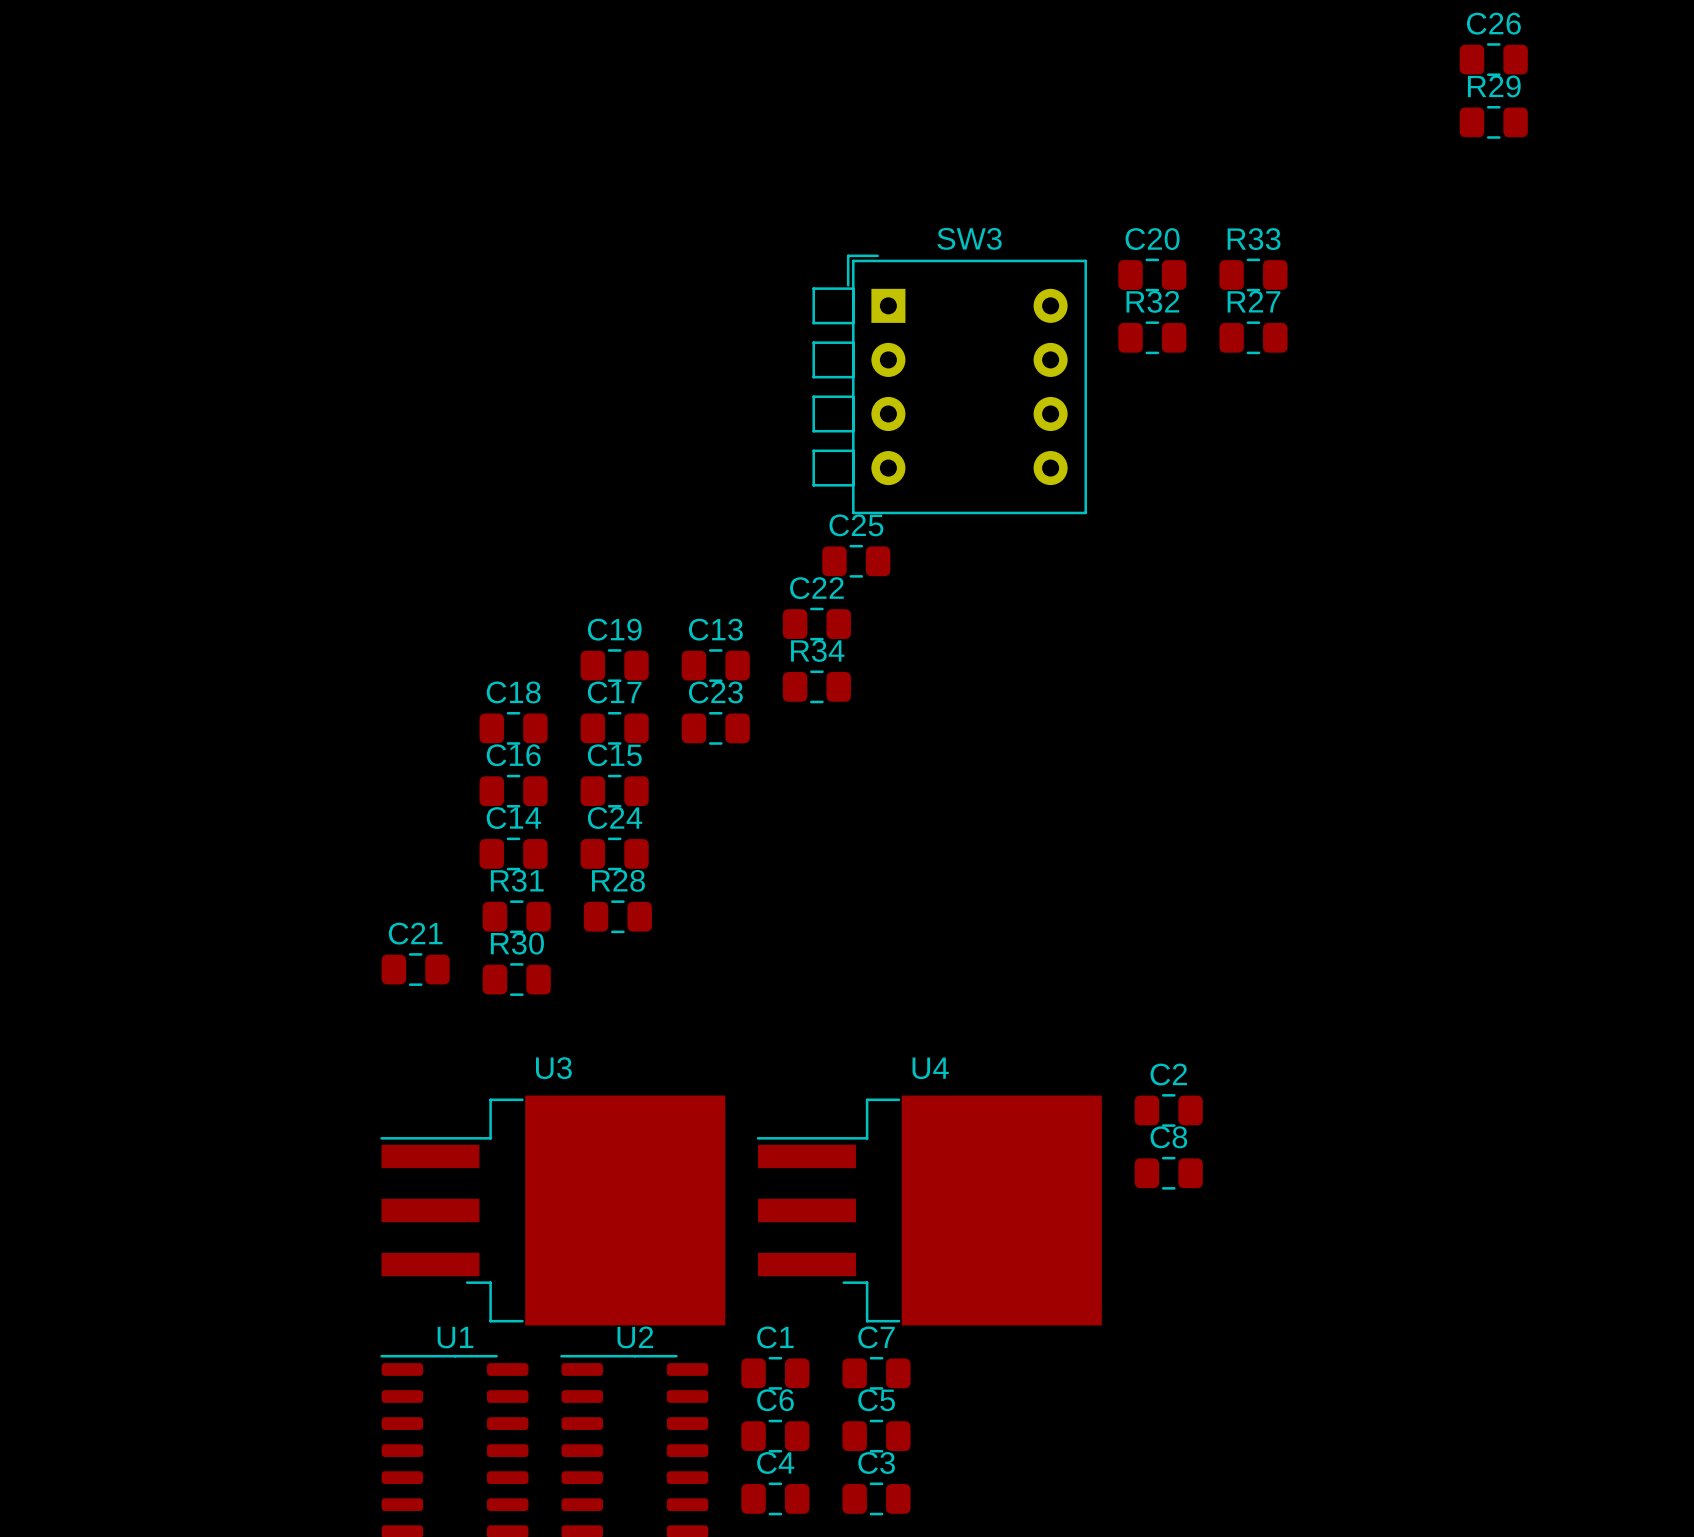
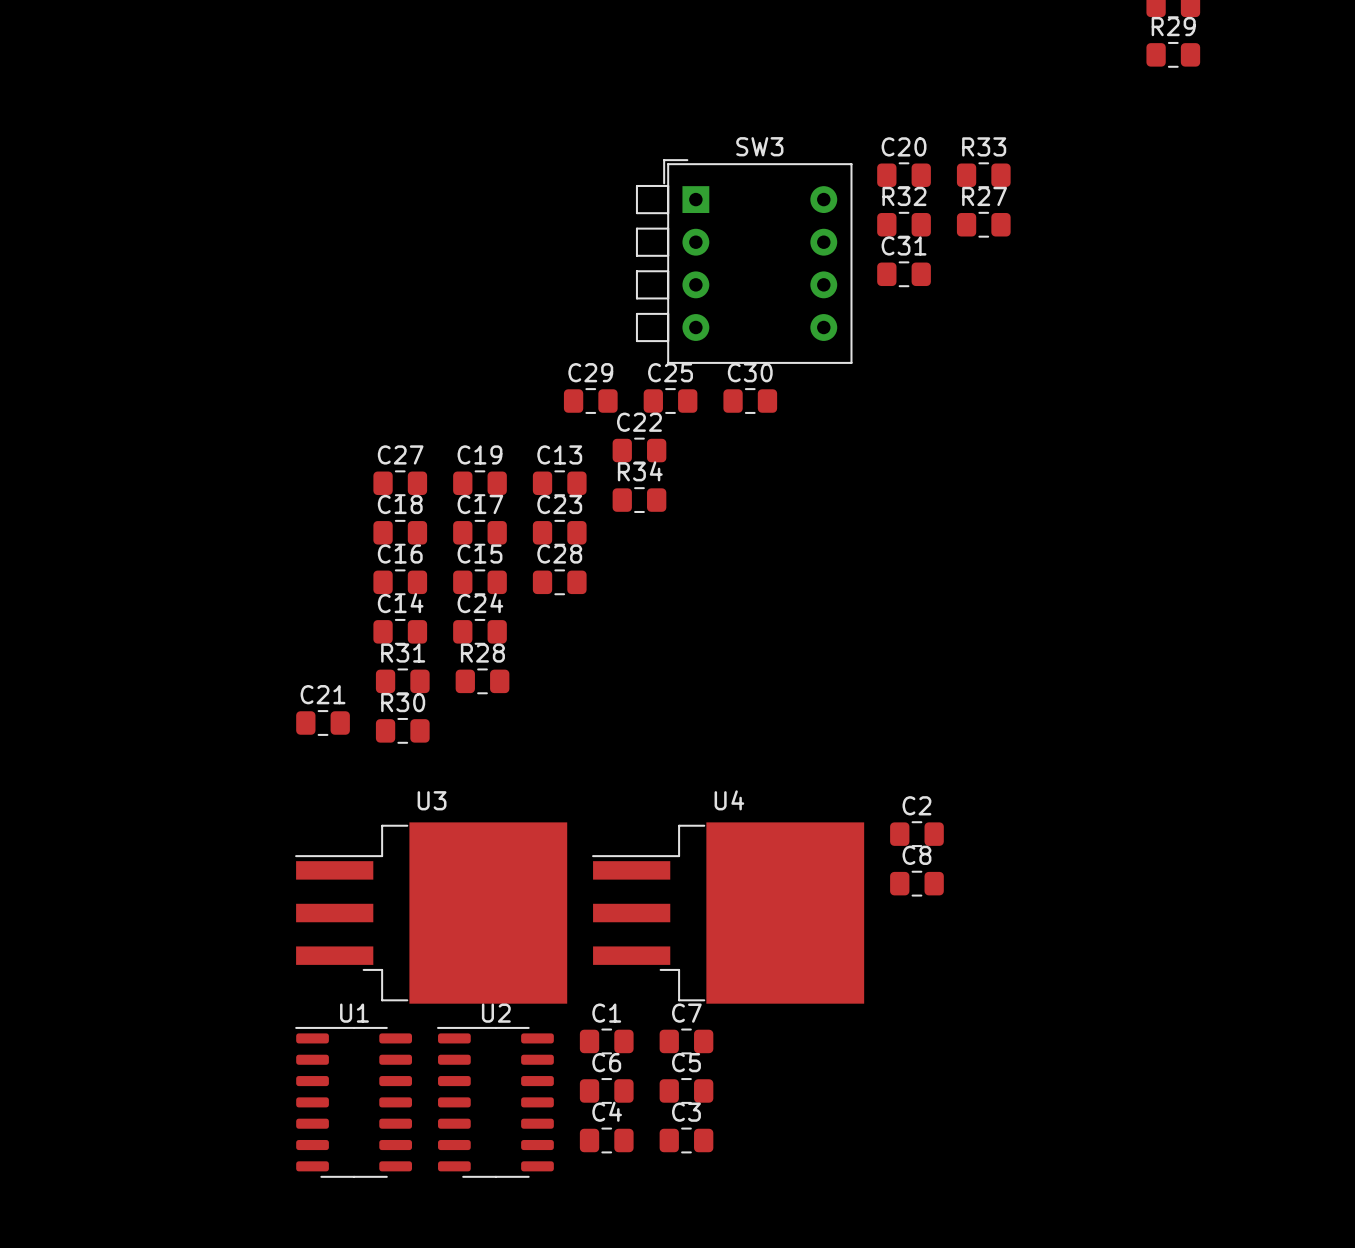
C31: none -> (904, 274)
C29: none -> (590, 401)
C30: none -> (750, 401)
C27: none -> (400, 483)
C28: none -> (559, 582)

